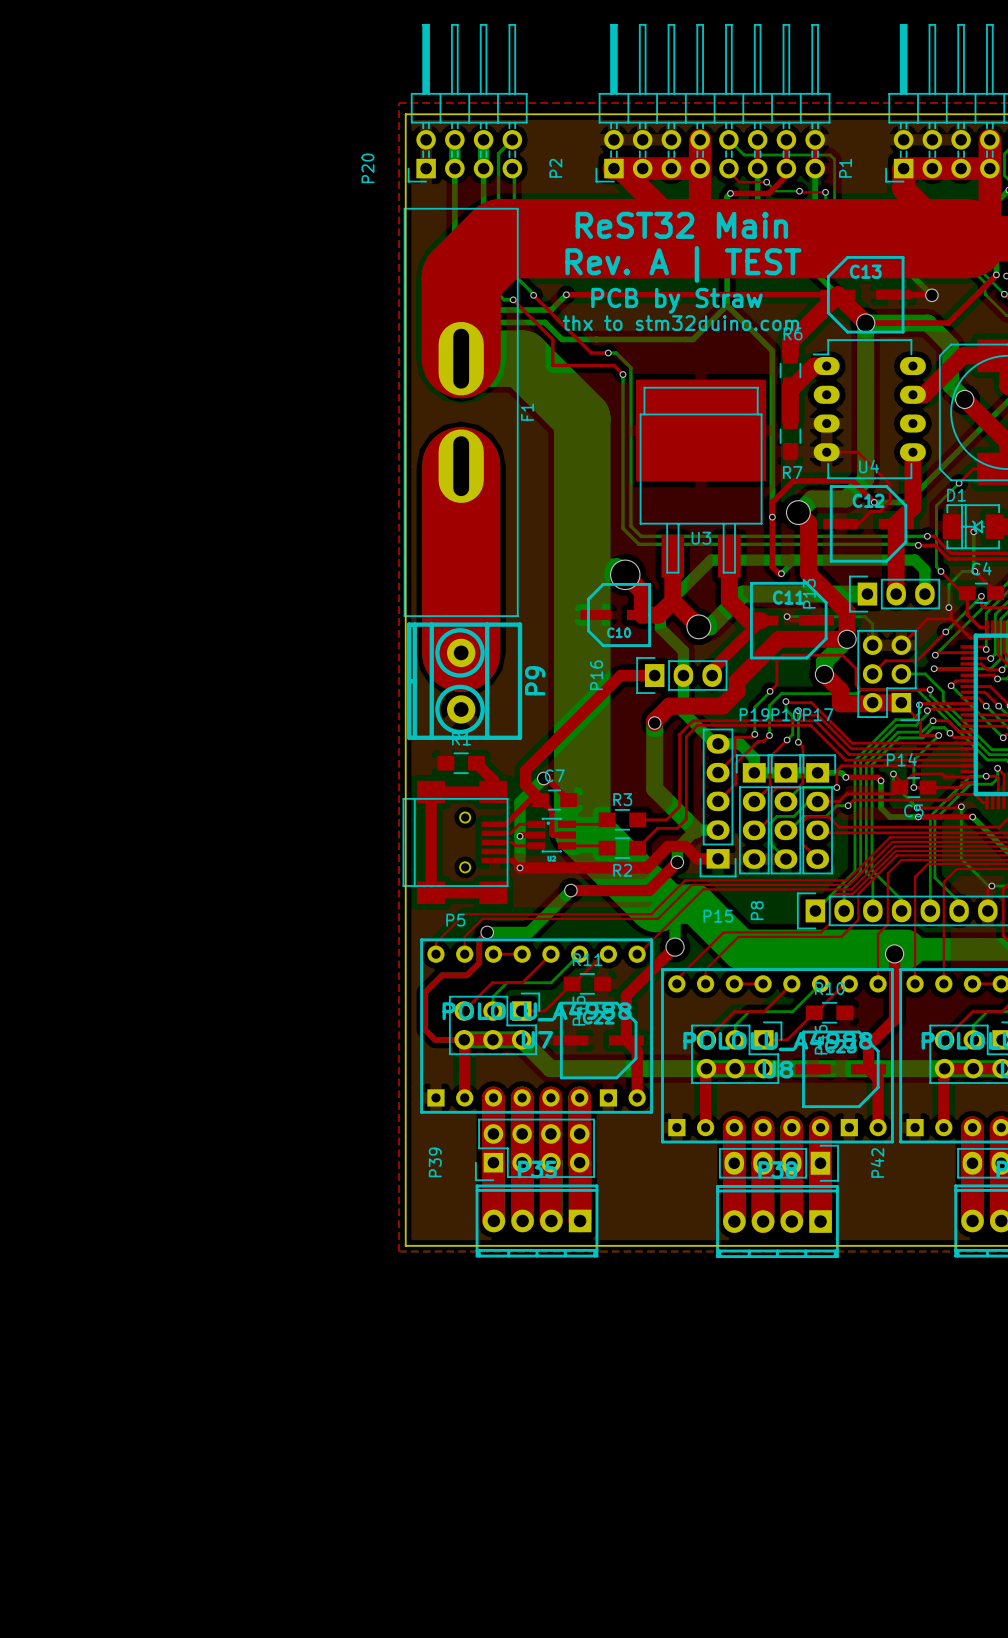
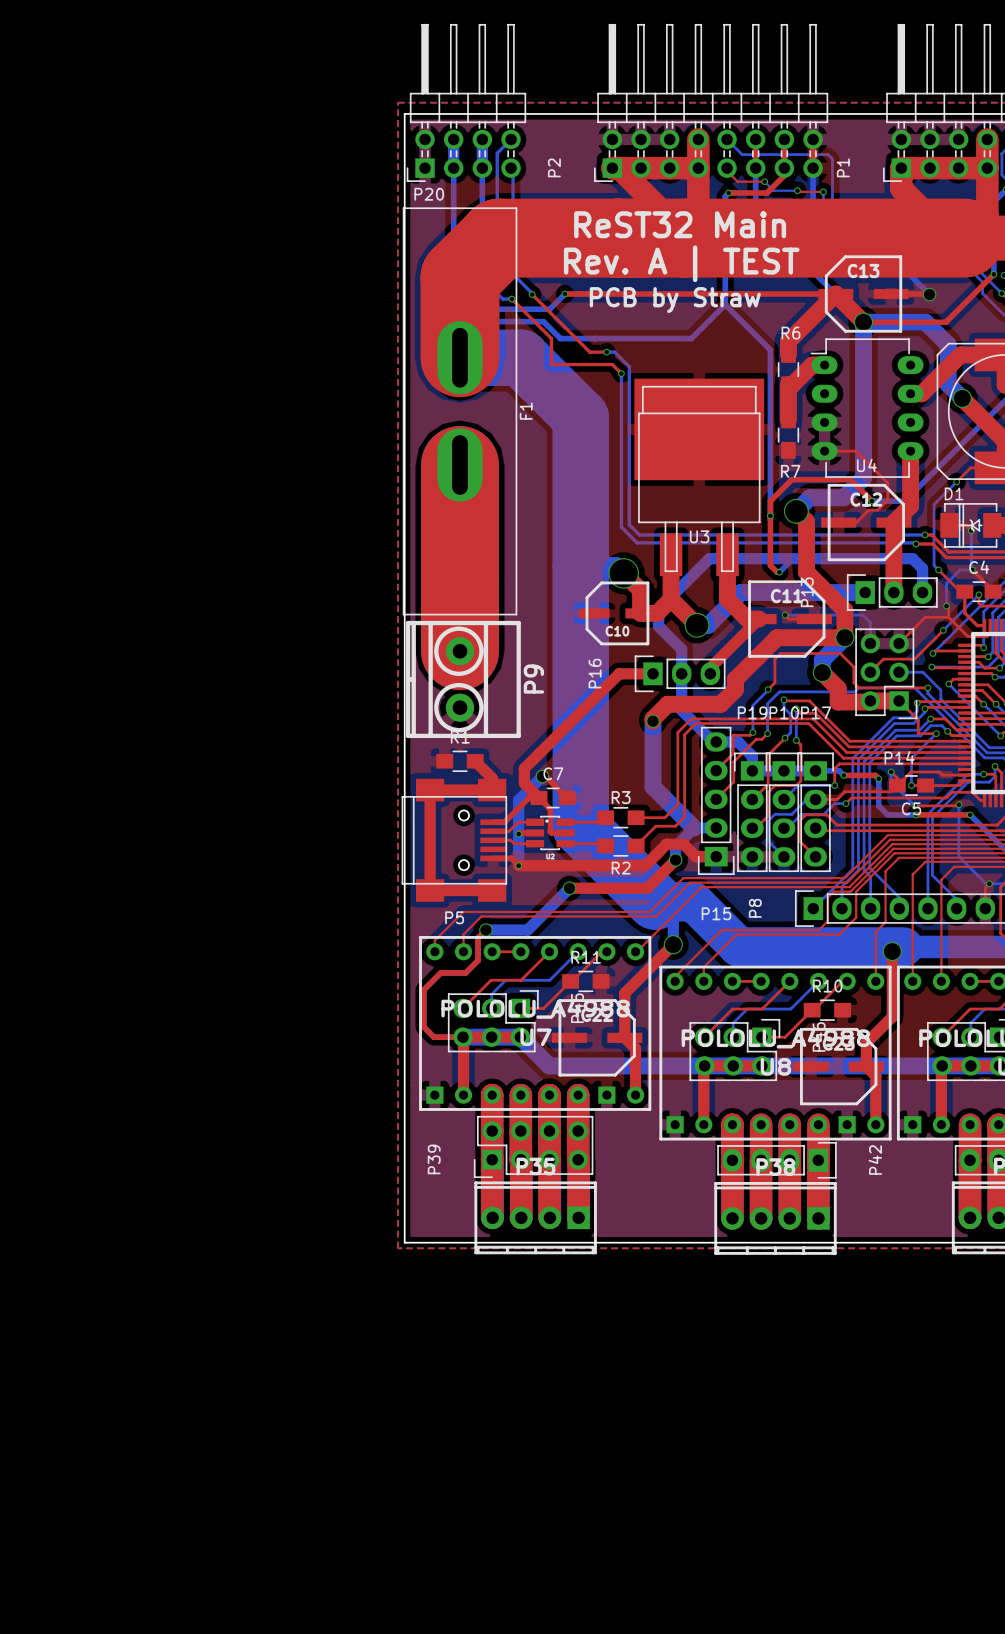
P20 name rotation: 0° (367, 168) -> 90° clockwise (429, 194)
P20 name position: P20 (367, 168) -> P20 (429, 194)
text: thx to stm32duino.com (680, 323) -> none

